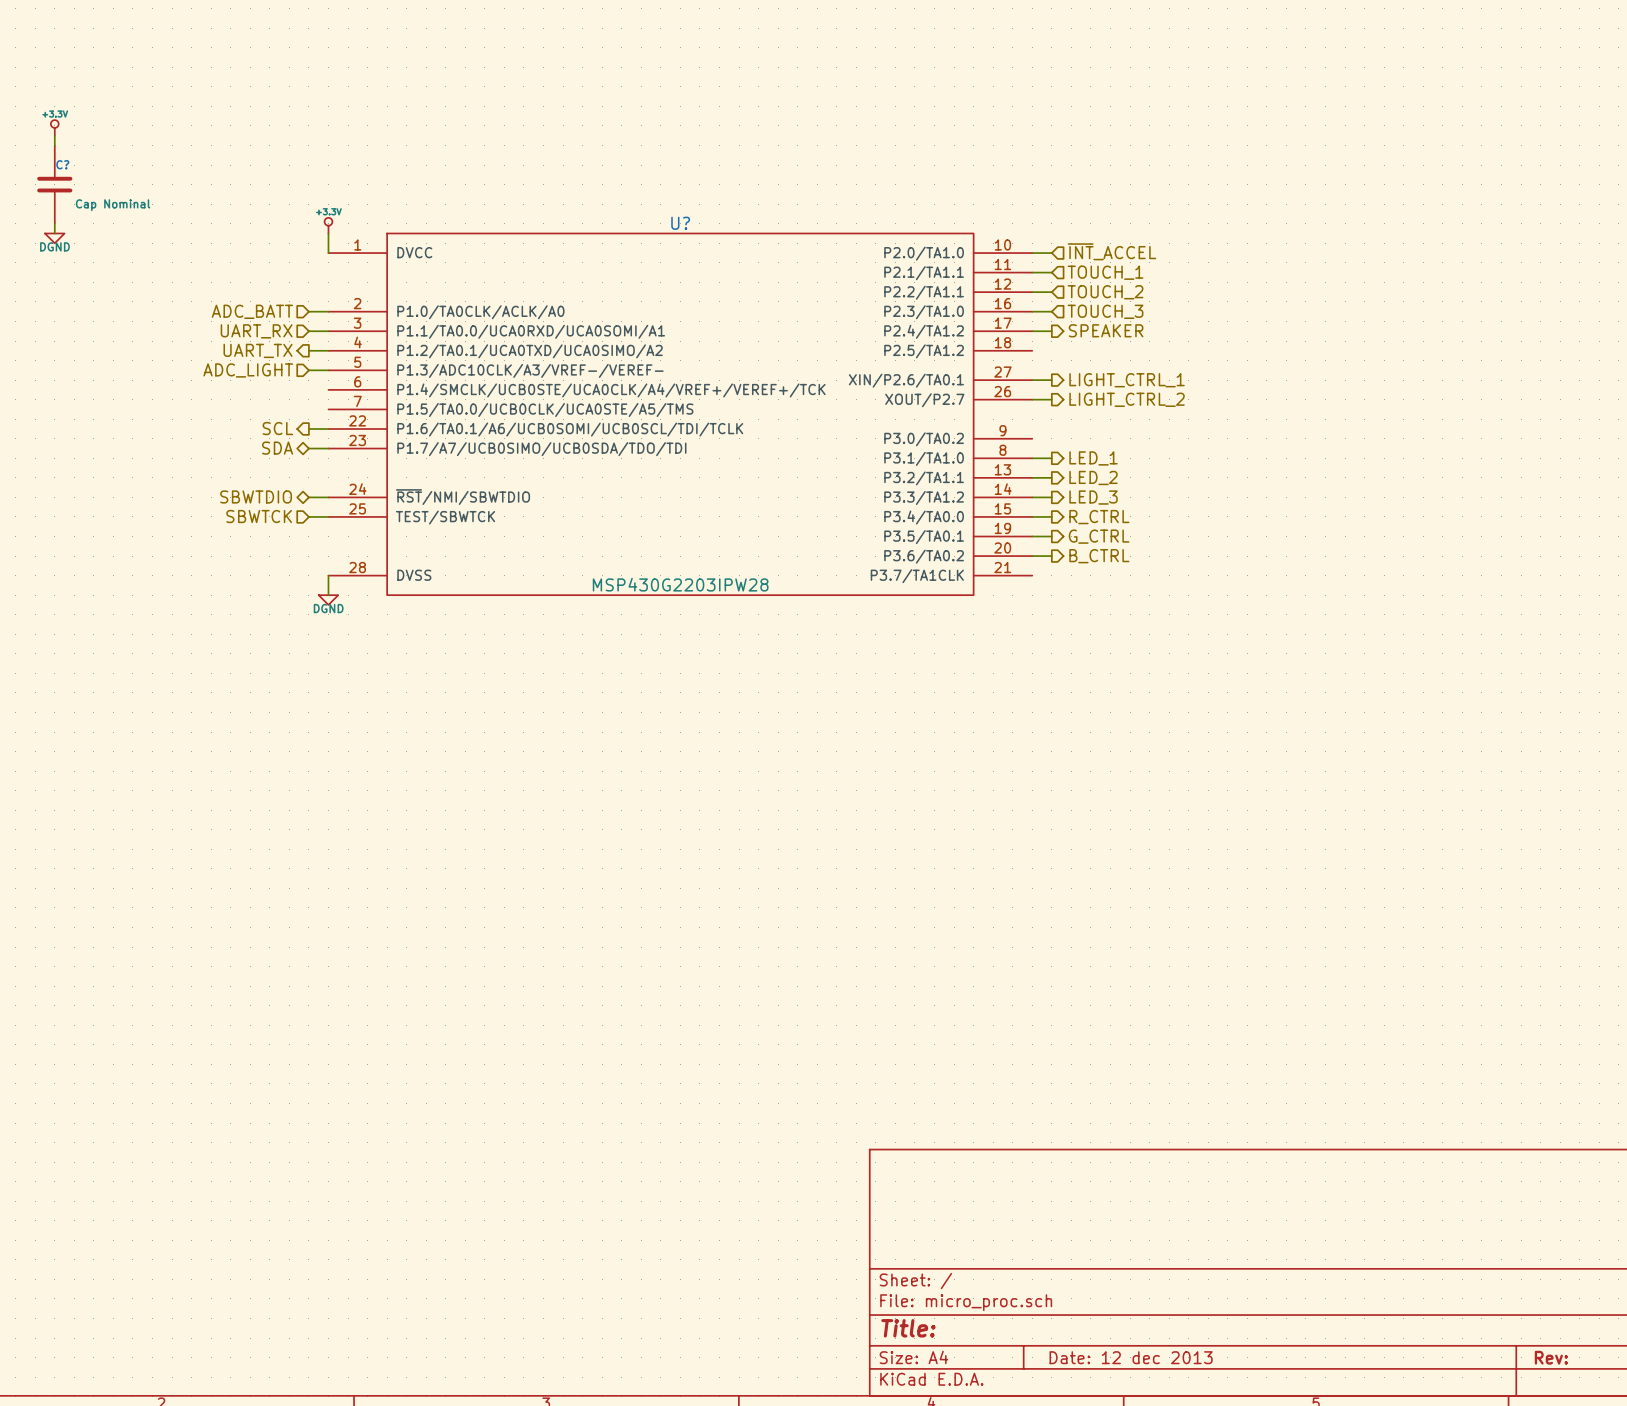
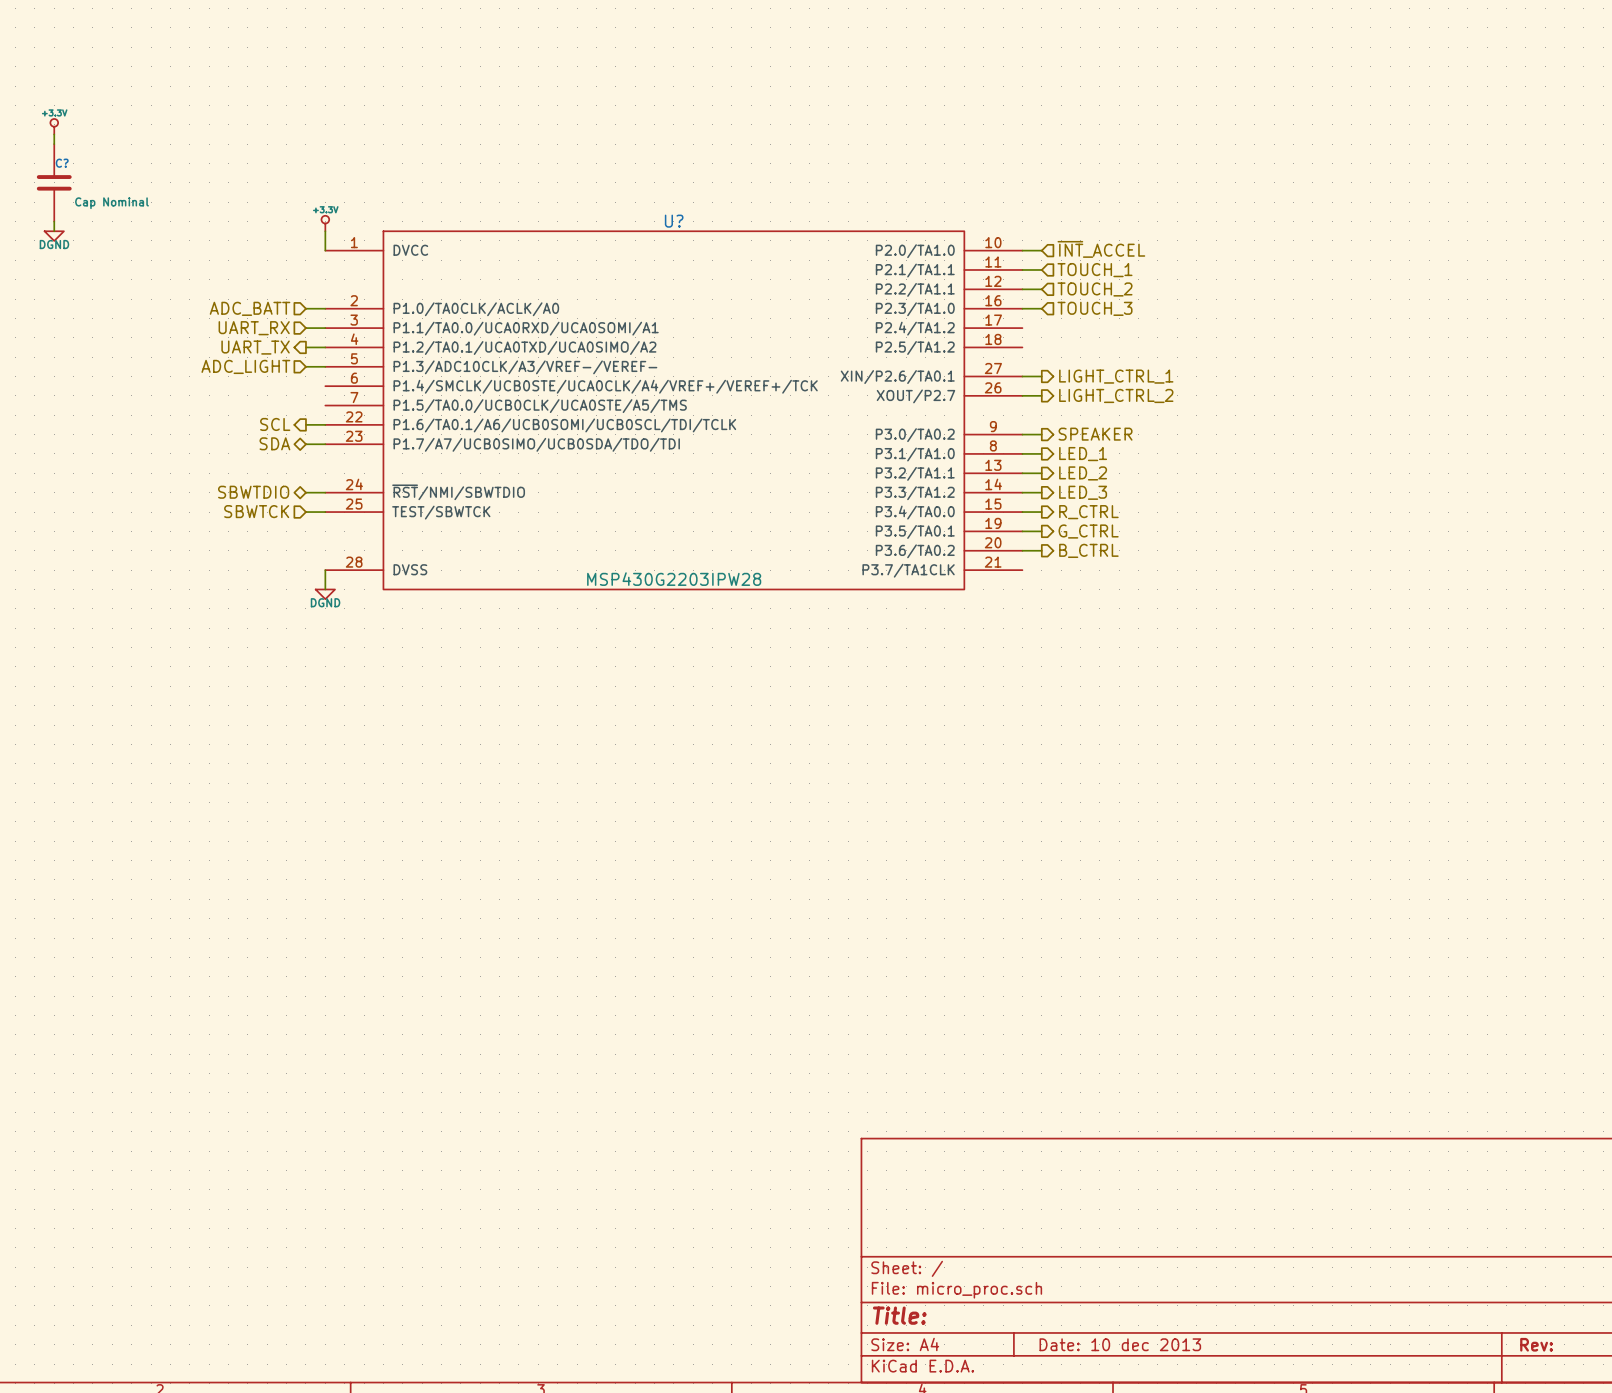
hierarchical label position: SPEAKER (1106, 330) -> SPEAKER (1095, 434)
wire: (1032, 331) (1051, 331) -> (1022, 434) (1041, 434)
title block: Date: 12 dec 2013 (1131, 1357) -> Date: 10 dec 2013 (1120, 1344)

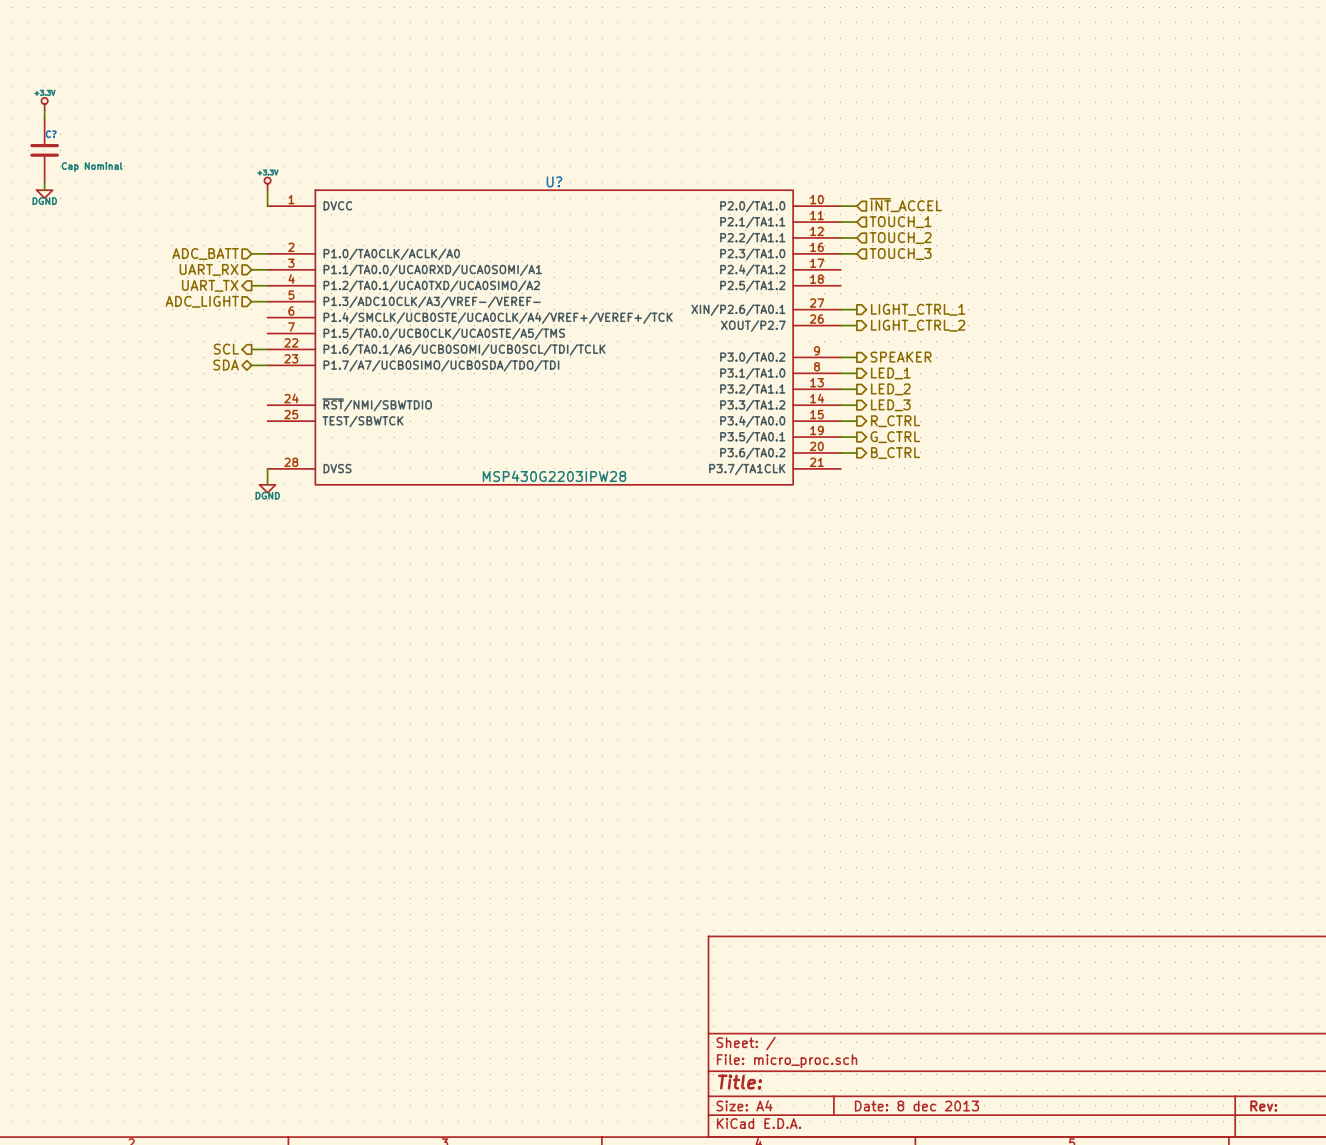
hierarchical label: SBWTDIO (253, 492) -> none
wire: (305, 492) (325, 492) -> none
hierarchical label: SBWTCK (256, 511) -> none
wire: (305, 512) (325, 512) -> none
title block: Date: 10 dec 2013 (1120, 1344) -> Date: 8 dec 2013 (916, 1106)

